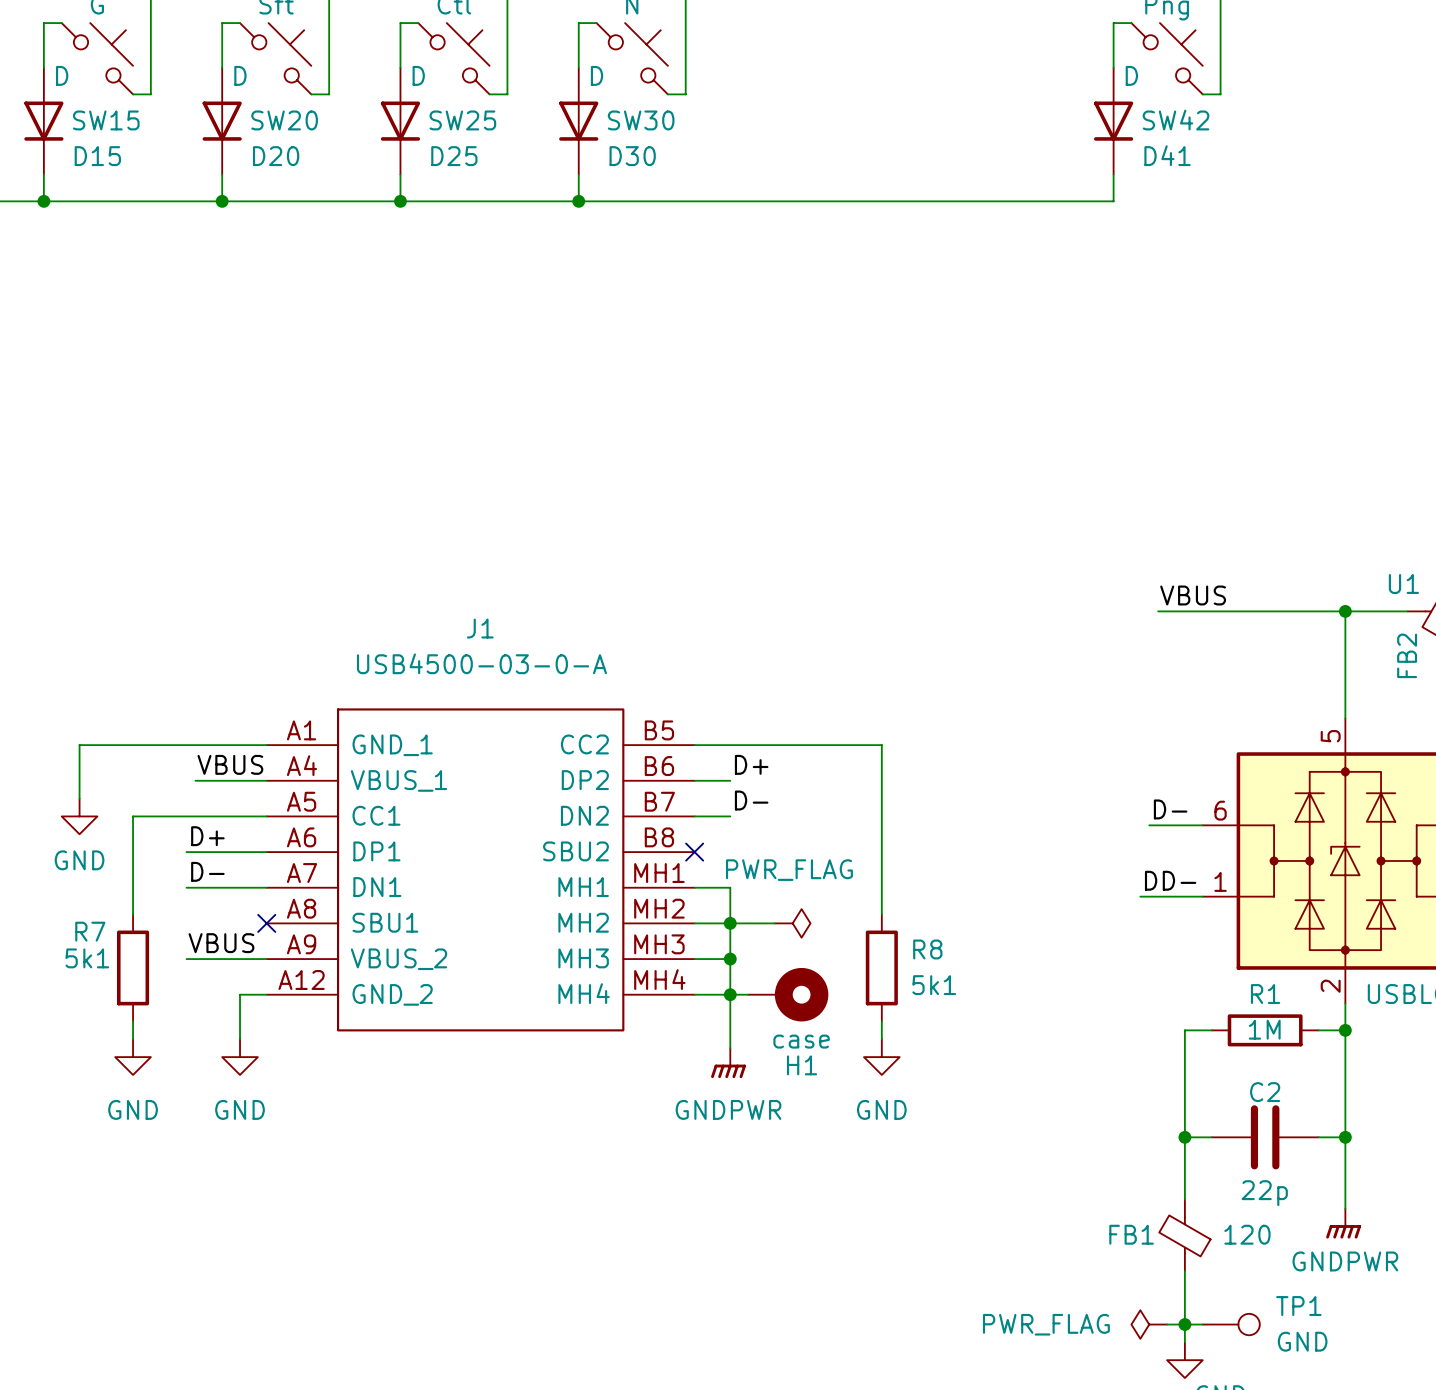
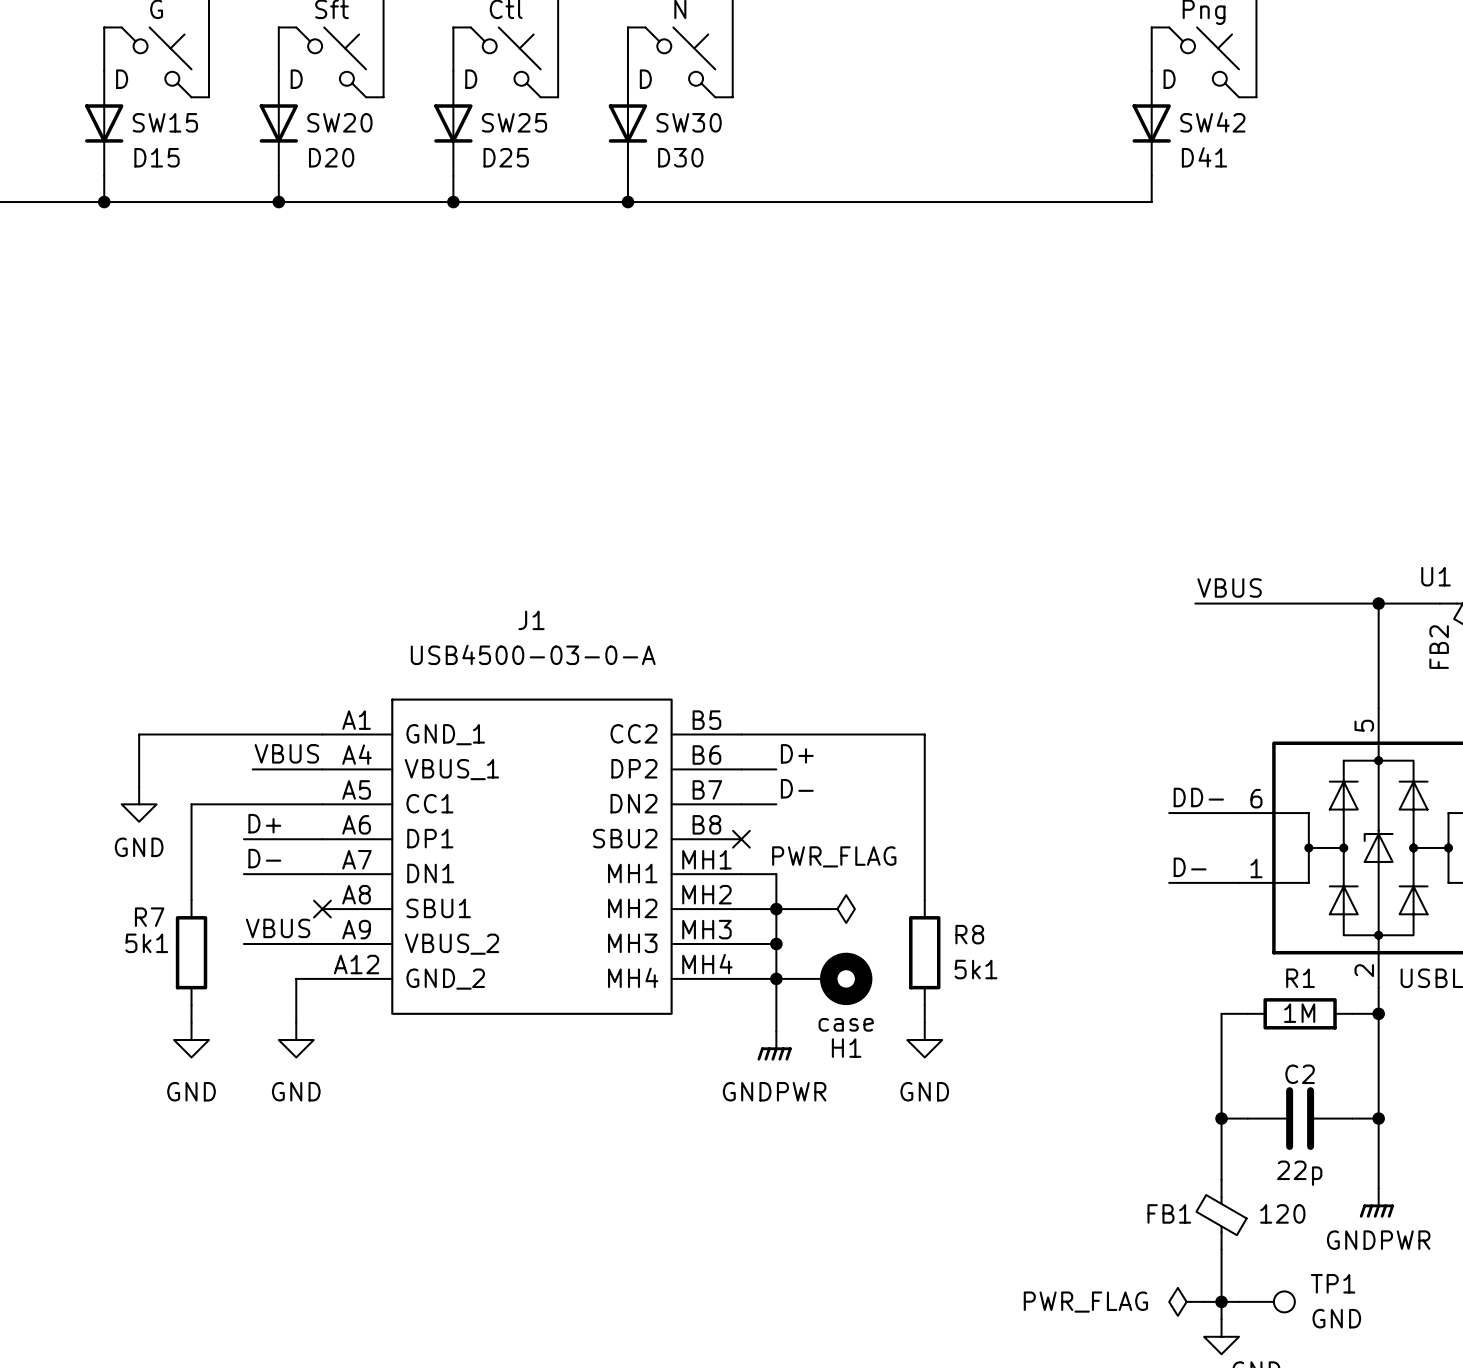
label position: D- (1170, 809) -> D- (1190, 867)
wire: none -> (1169, 813) (1186, 813)
label position: DD- (1170, 880) -> DD- (1198, 797)
wire: none -> (1169, 882) (1177, 882)

